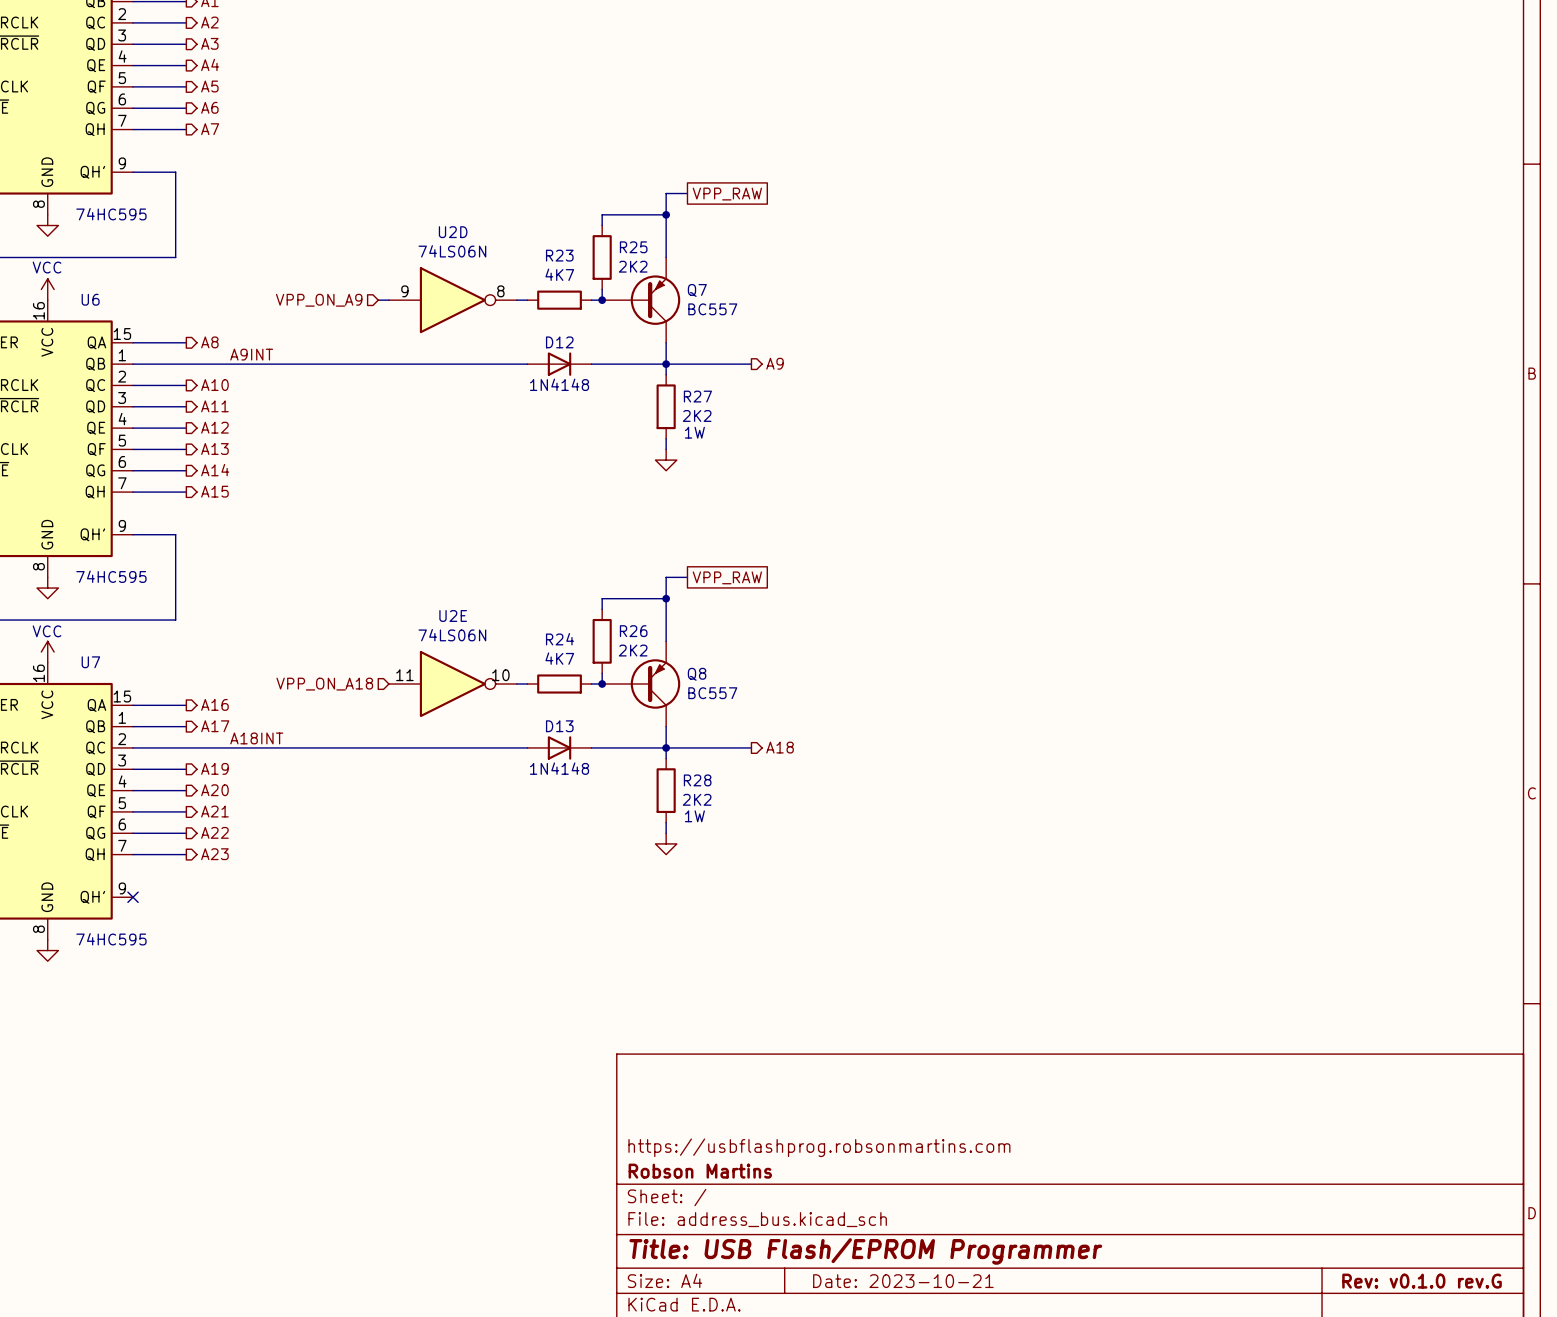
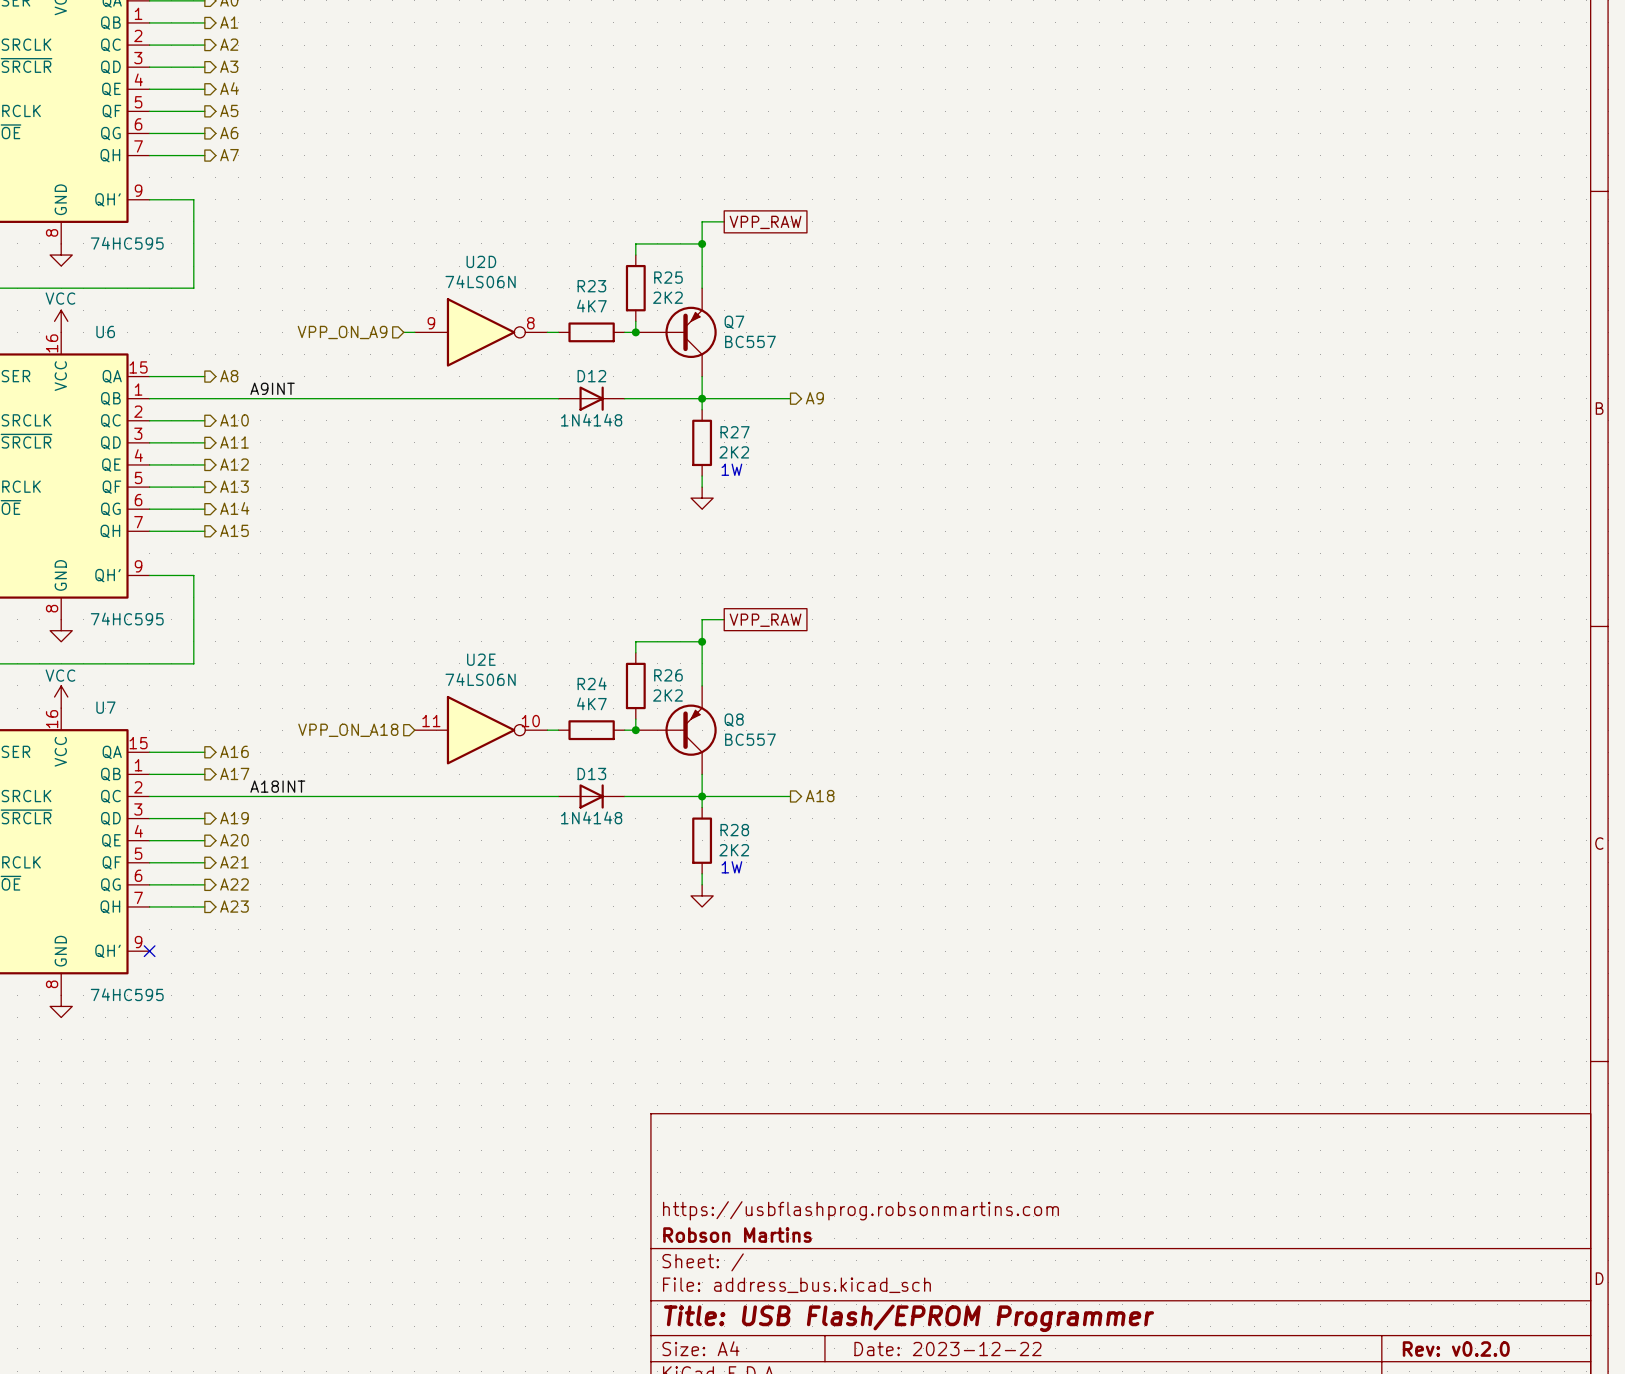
title block: Date: 2023-10-21 (903, 1281) -> Date: 2023-12-22 (947, 1349)
title block: Rev: v0.1.0 rev.G (1422, 1281) -> Rev: v0.2.0 (1456, 1349)

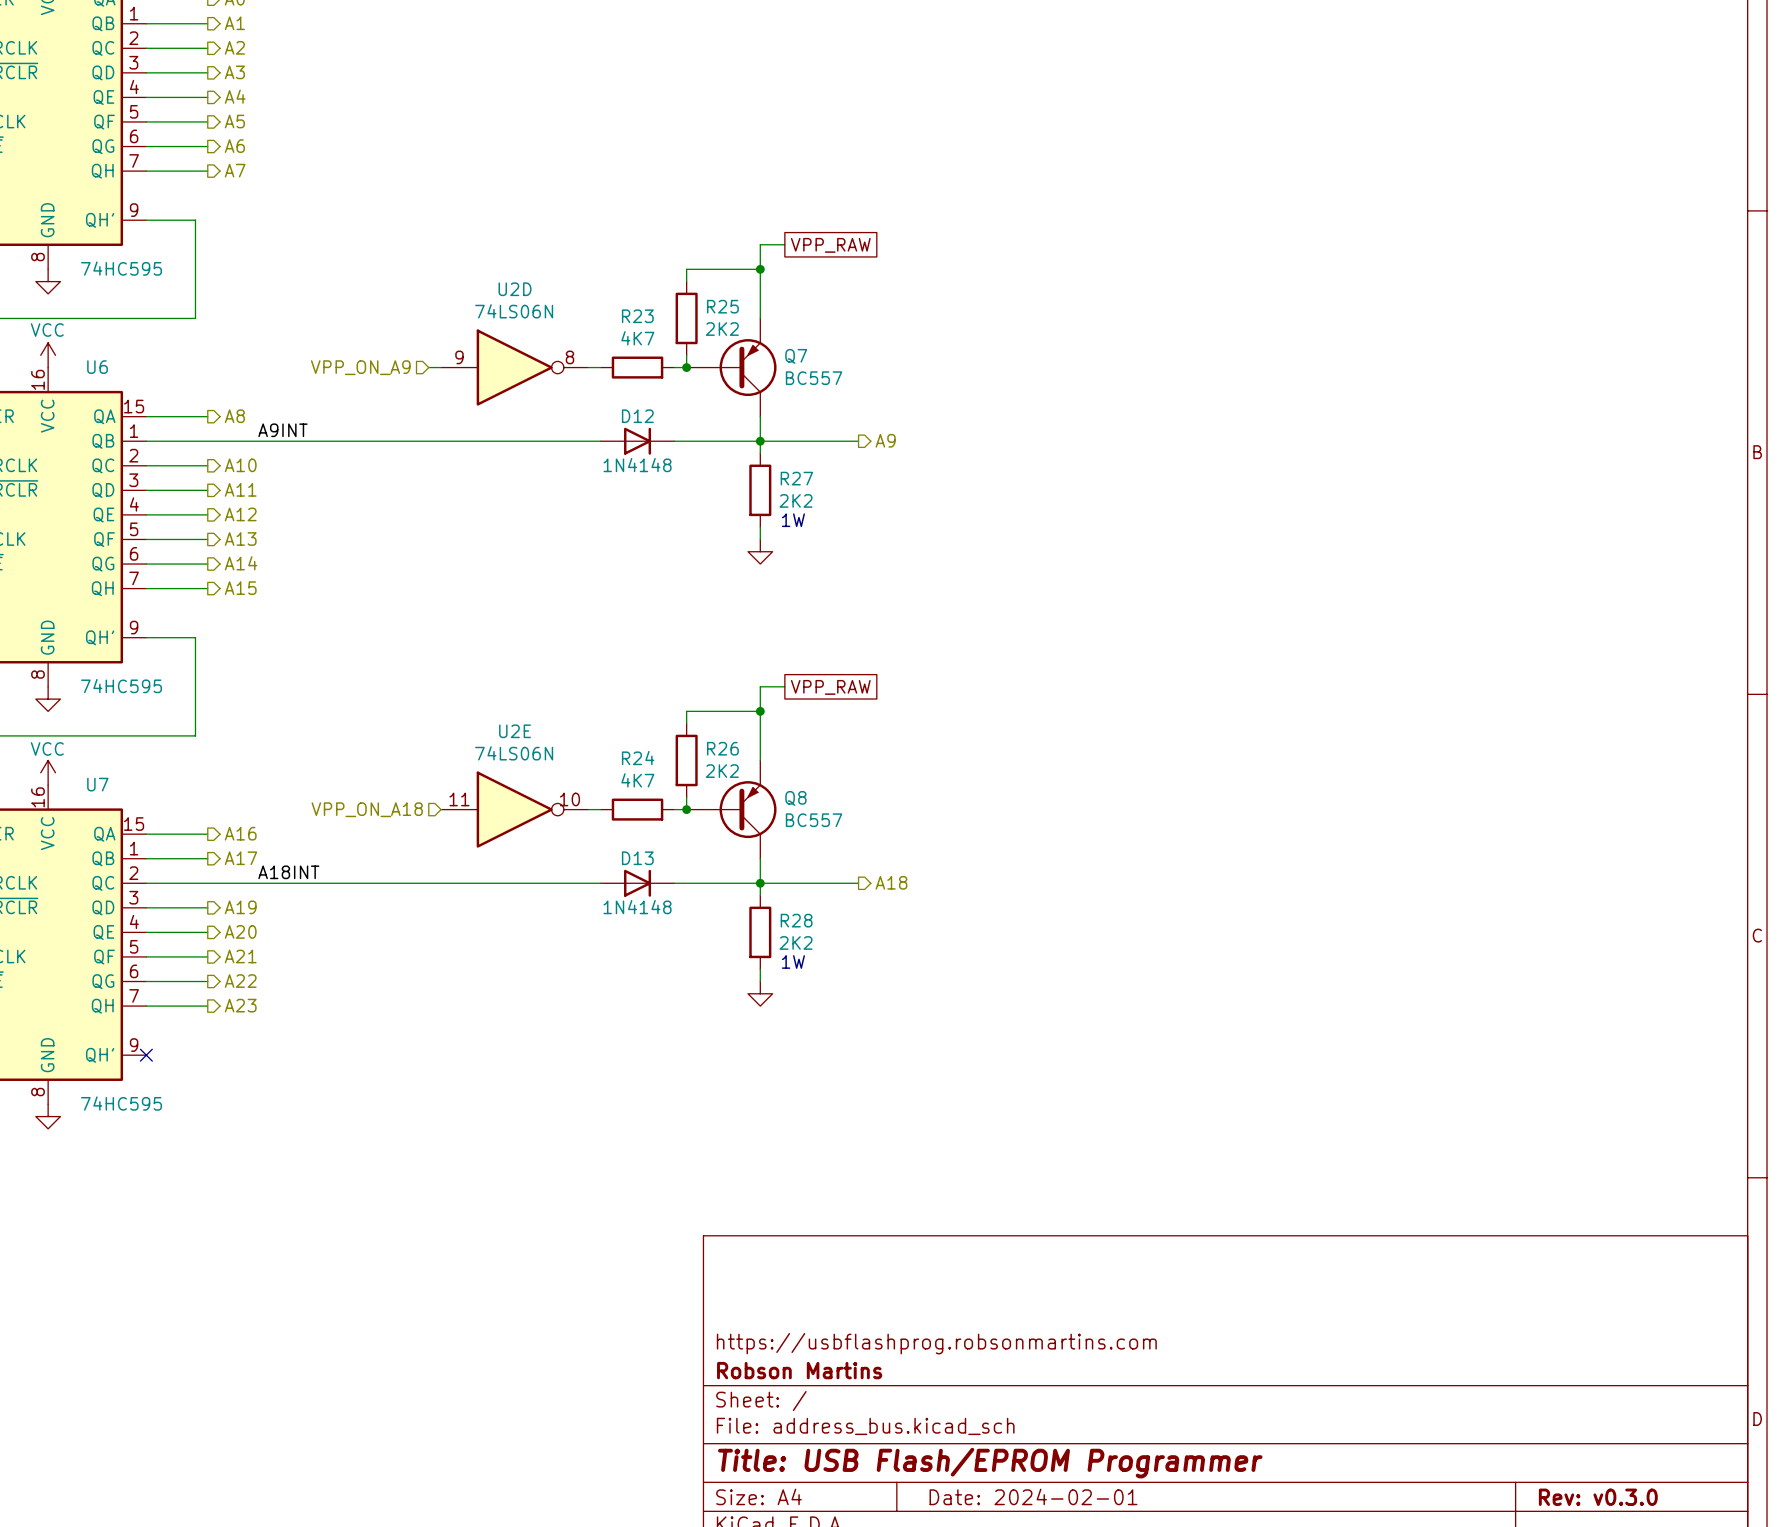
title block: Date: 2023-12-22 (947, 1349) -> Date: 2024-02-01 (1033, 1496)
title block: Rev: v0.2.0 (1456, 1349) -> Rev: v0.3.0 (1598, 1497)

